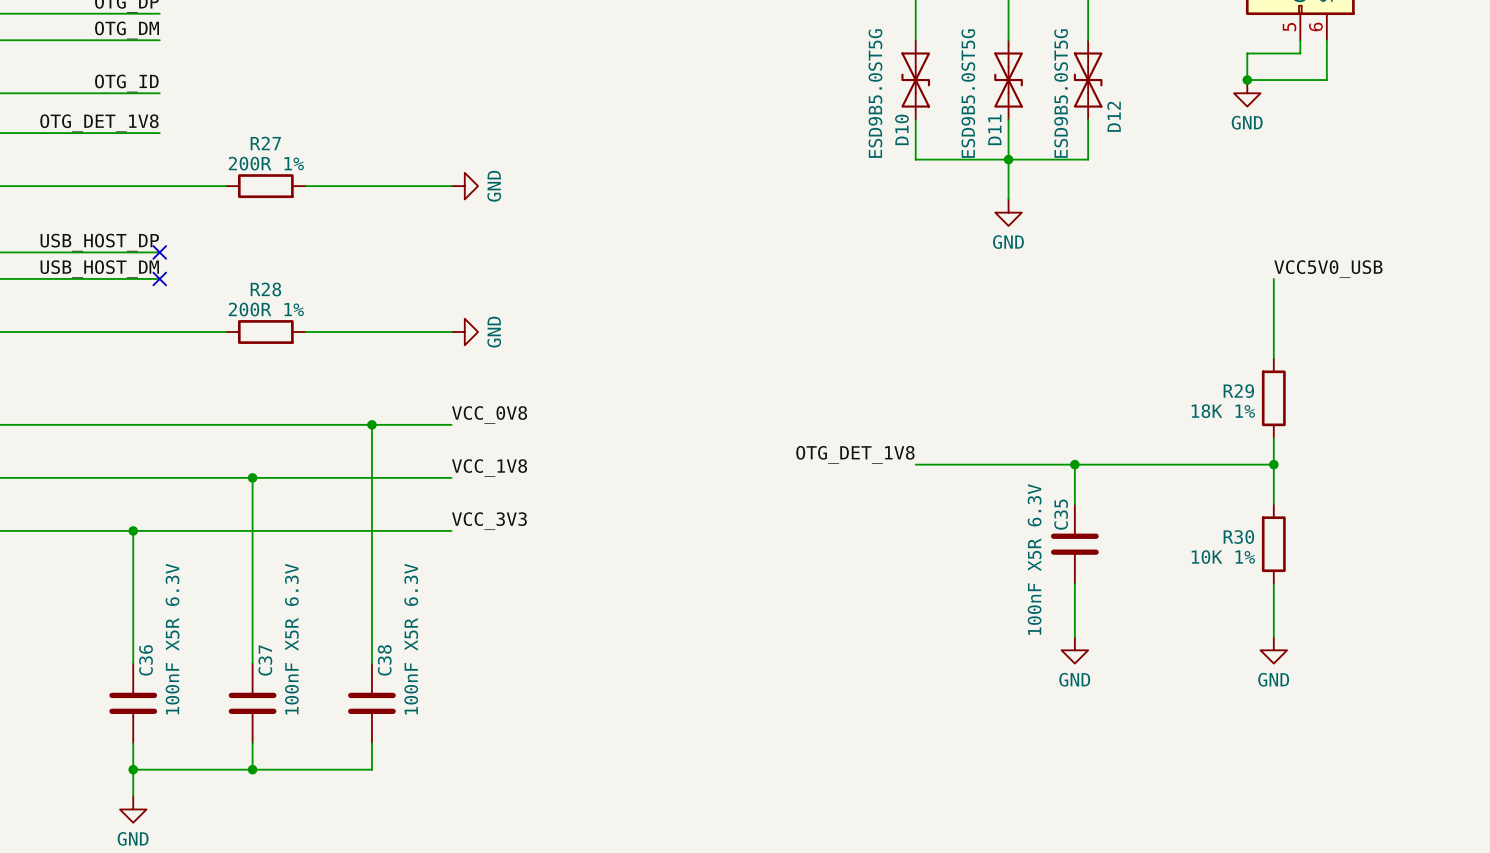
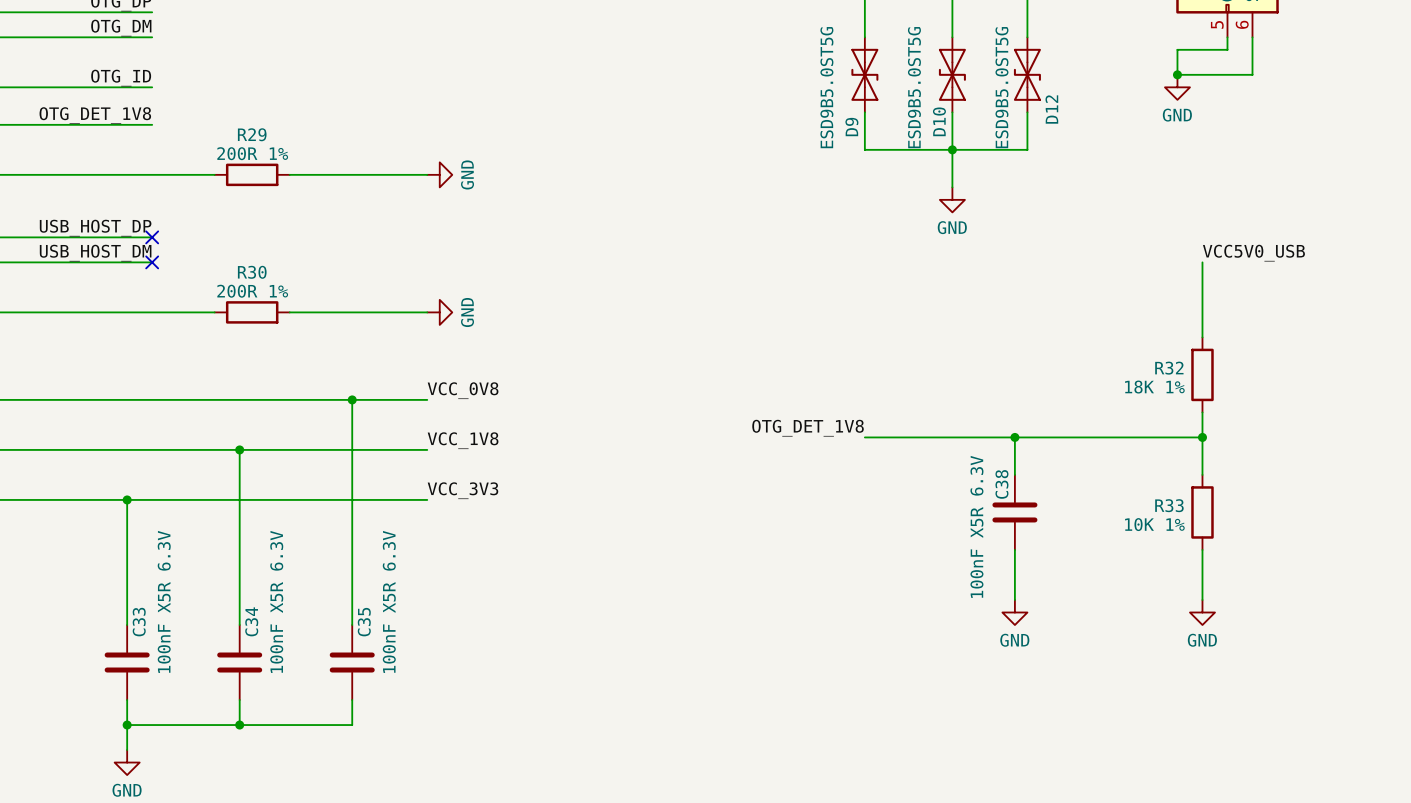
D10 name: D10 (901, 129) -> D9 (851, 127)
D11 name: D11 (994, 129) -> D10 (939, 121)
R27 name: R27 (265, 143) -> R29 (252, 134)
R28 name: R28 (265, 289) -> R30 (252, 272)
R29 name: R29 (1238, 391) -> R32 (1169, 368)
C35 name: C35 (1061, 514) -> C38 (1001, 484)
R30 name: R30 (1238, 537) -> R33 (1169, 505)
C36 name: C36 (146, 660) -> C33 (139, 622)
C37 name: C37 (265, 660) -> C34 (251, 621)
C38 name: C38 (384, 660) -> C35 (364, 622)

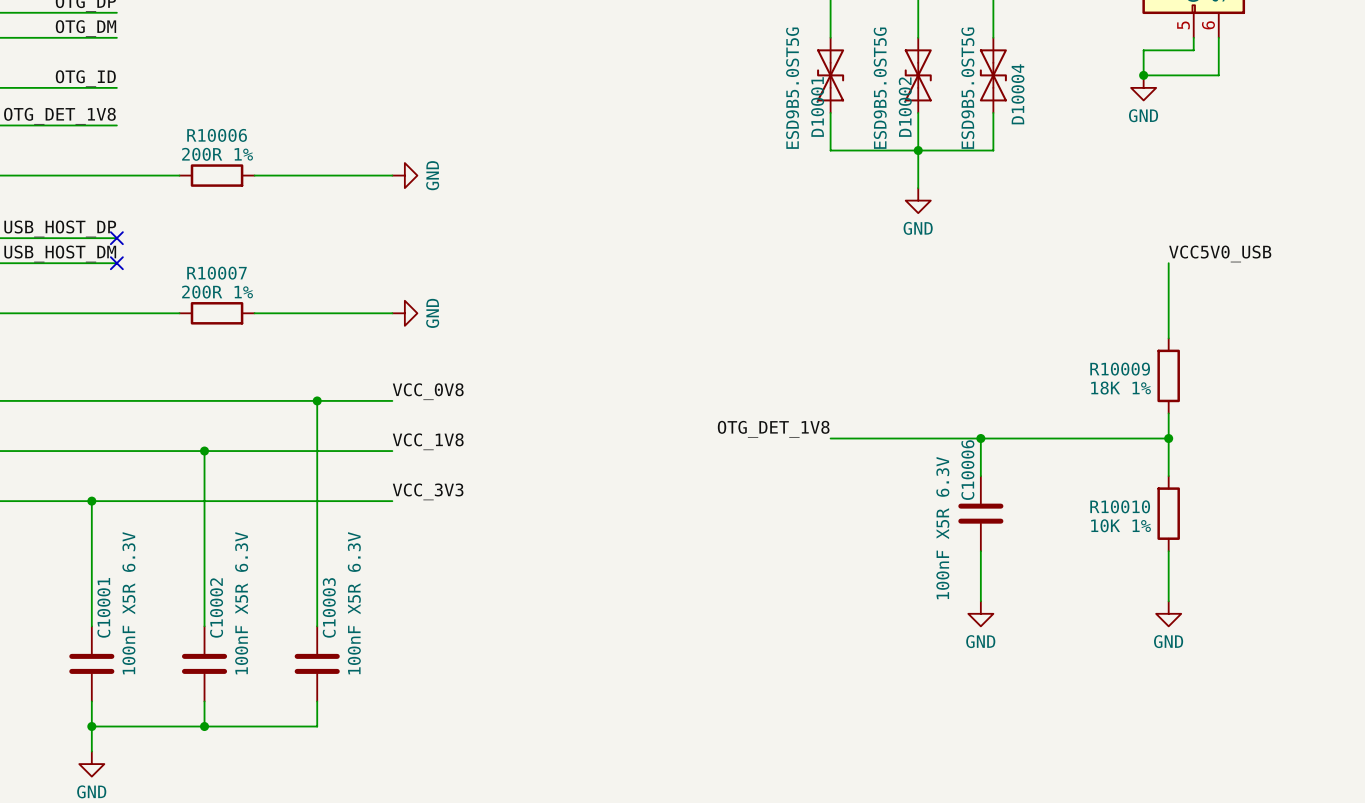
D12 name: D12 (1051, 109) -> D10004 (1017, 94)
D10 name: D10 (939, 121) -> D10002 (905, 107)
D9 name: D9 (851, 127) -> D10001 (817, 106)
R29 name: R29 (252, 134) -> R10006 (217, 135)
R30 name: R30 (252, 272) -> R10007 (216, 273)
R32 name: R32 (1169, 368) -> R10009 (1120, 369)
C38 name: C38 (1001, 484) -> C10006 (967, 470)
R33 name: R33 (1169, 505) -> R10010 (1120, 506)
C34 name: C34 (251, 621) -> C10002 (216, 607)
C33 name: C33 (139, 622) -> C10001 (103, 607)
C35 name: C35 (364, 622) -> C10003 (329, 607)

